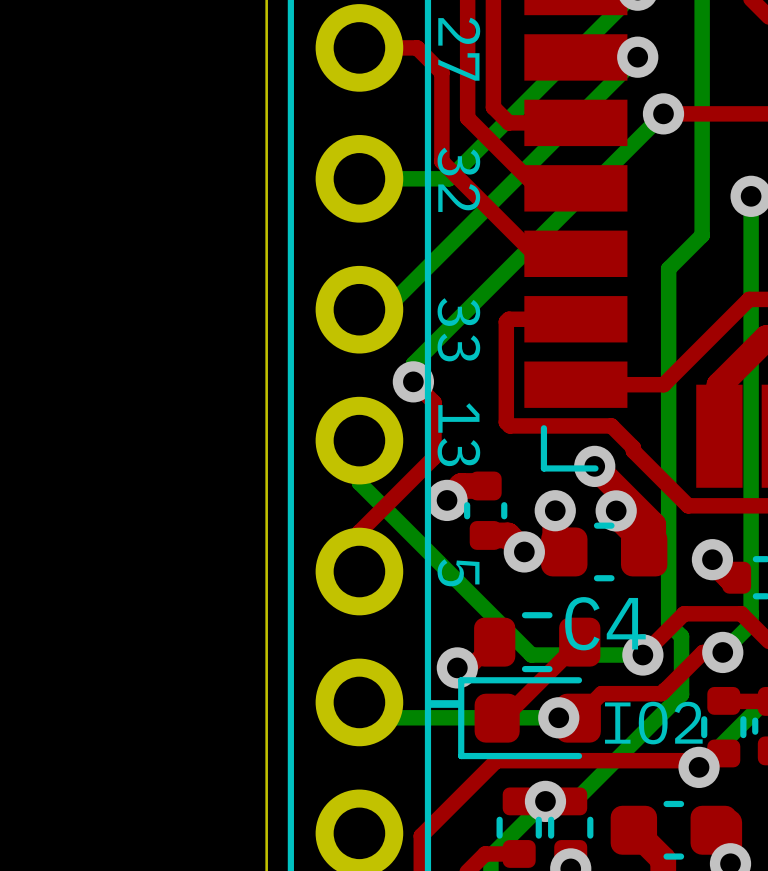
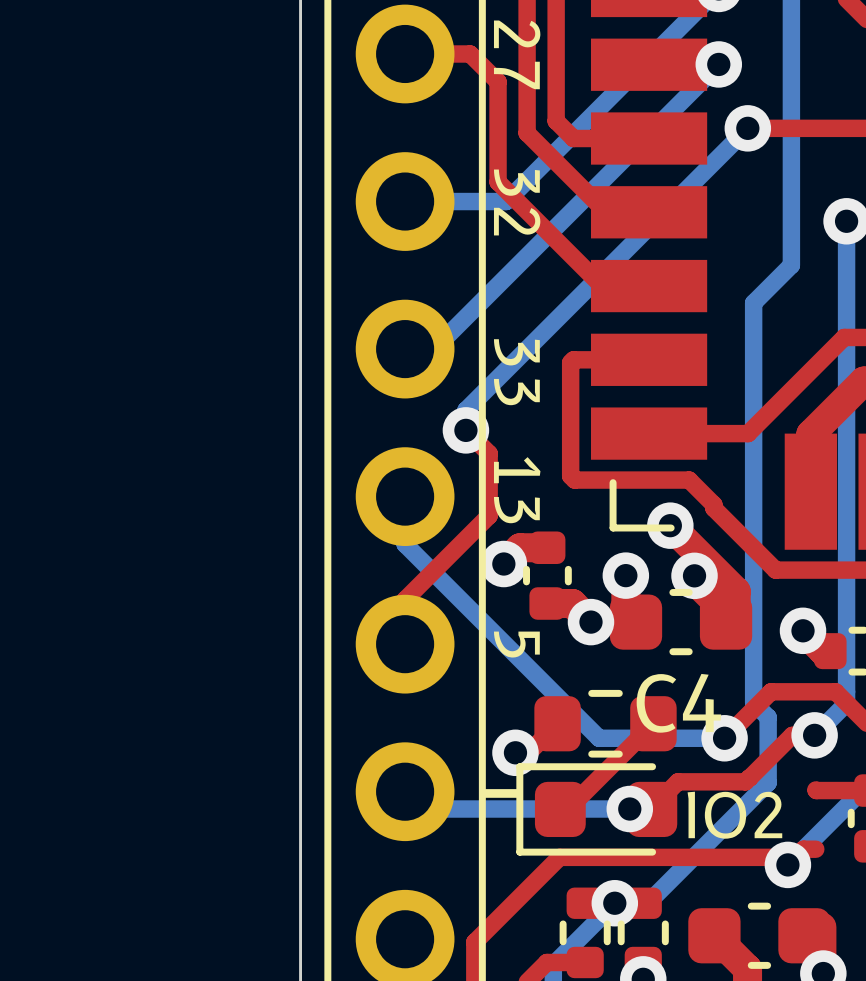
part: (723, 727) -> none

